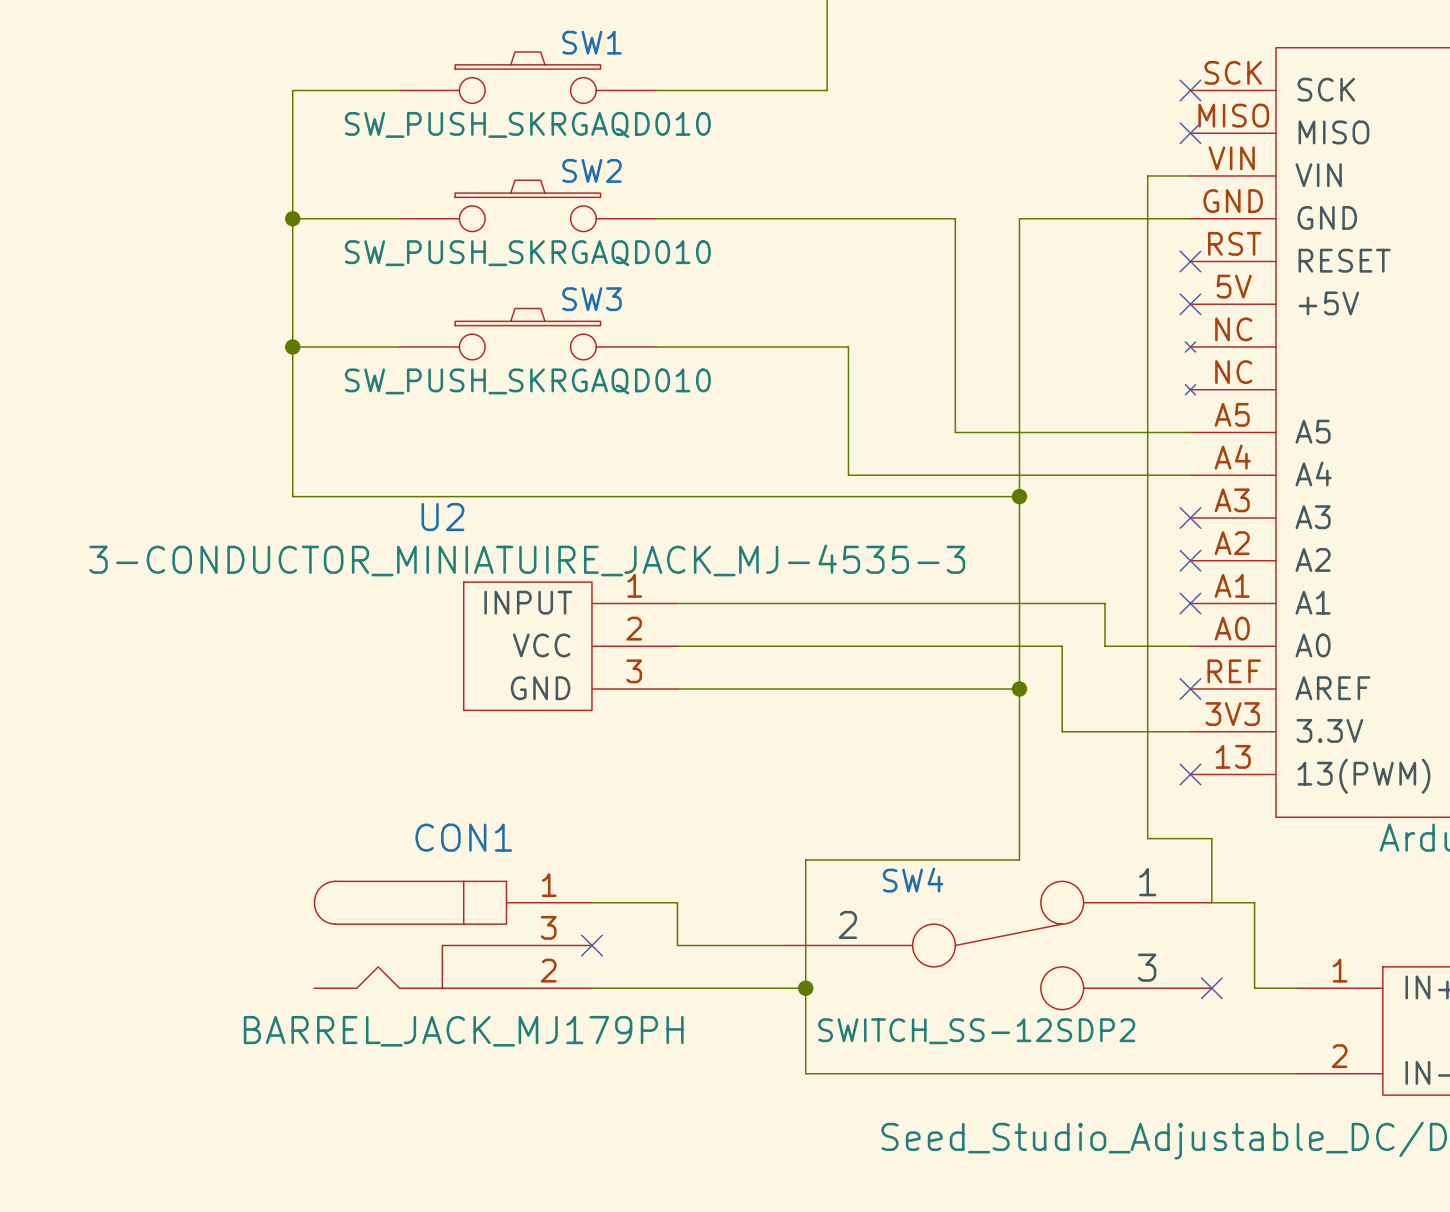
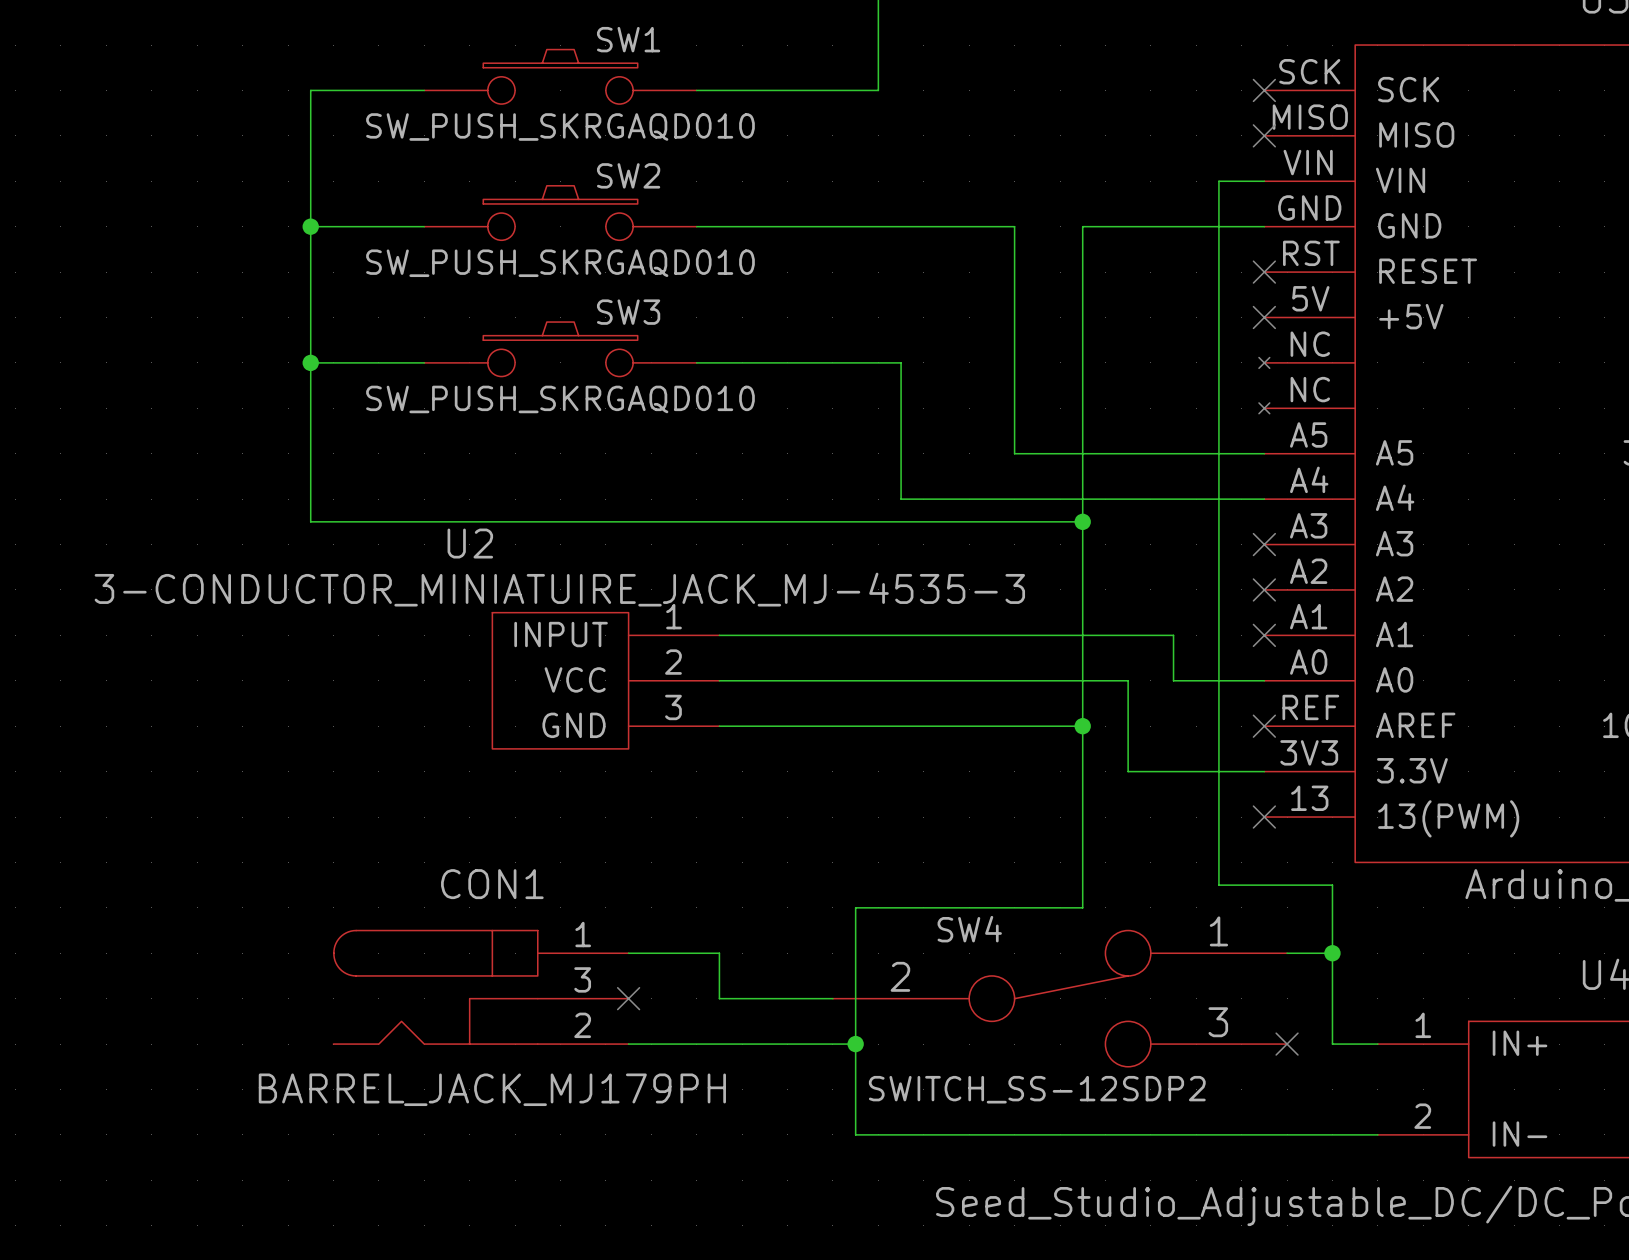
wire: (1211, 838) (1211, 902) -> (1287, 885) (1332, 885) (1332, 953)
junction: none -> (1332, 953)

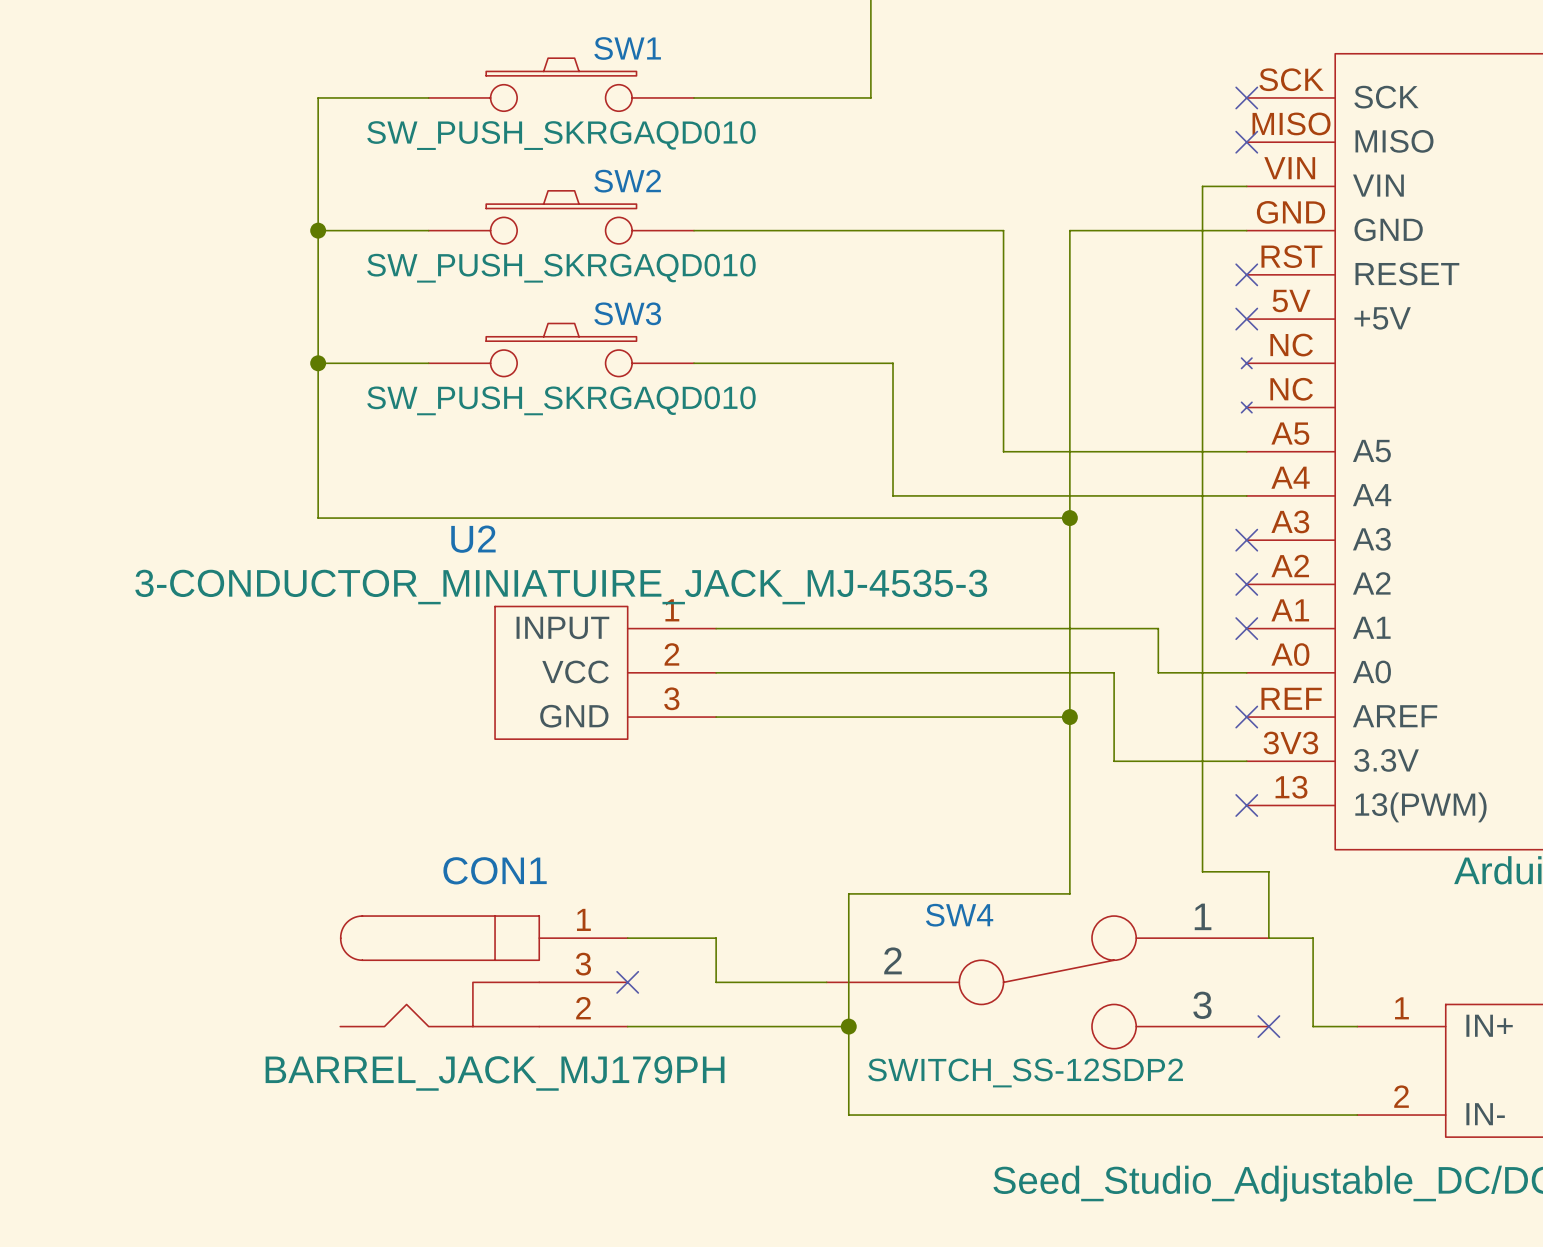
wire: (1287, 885) (1332, 885) (1332, 953) -> (1268, 871) (1268, 938)
junction: (1332, 953) -> none

